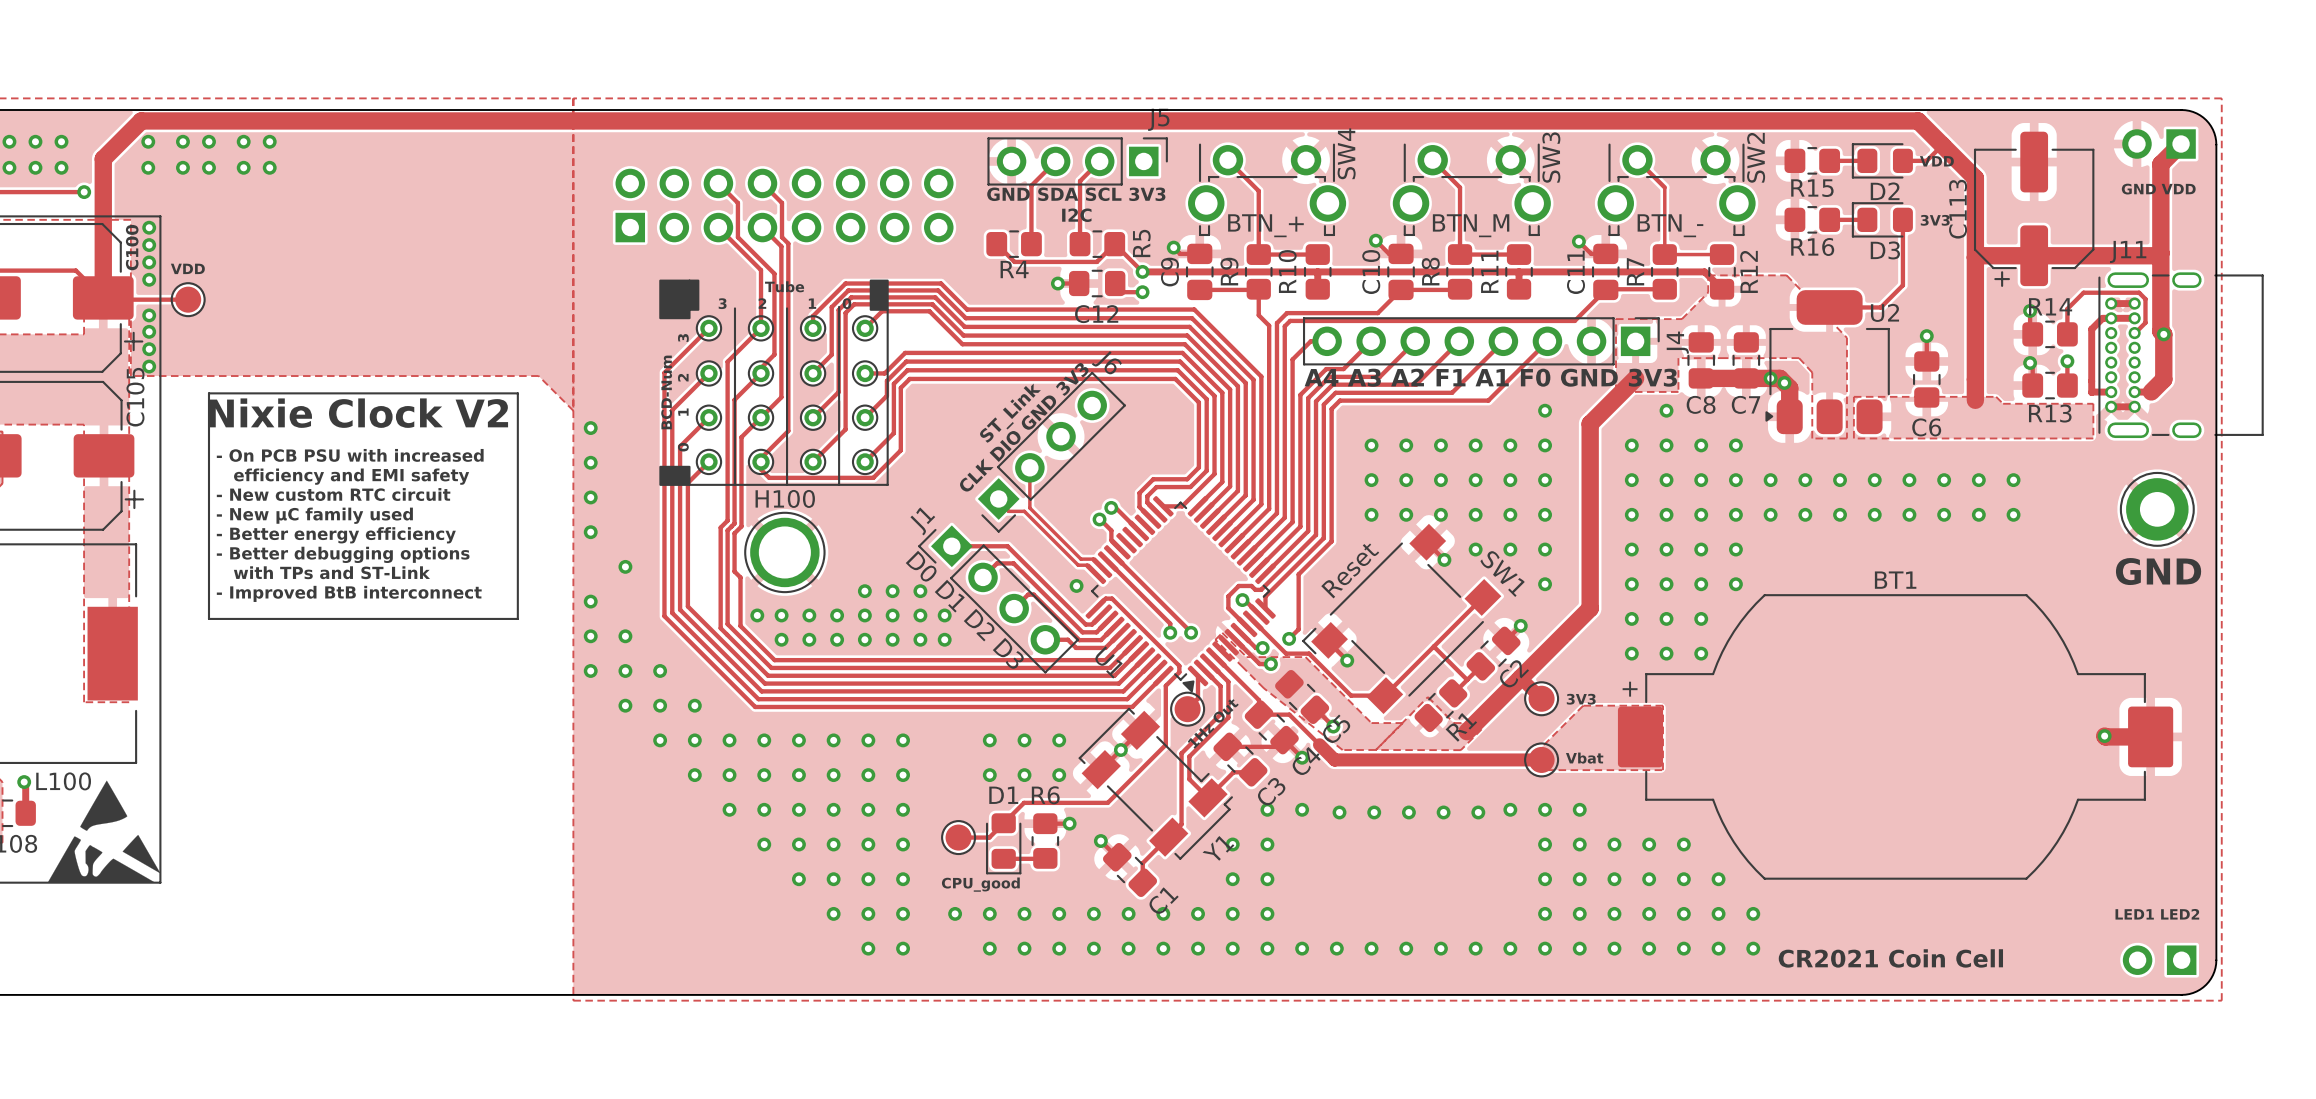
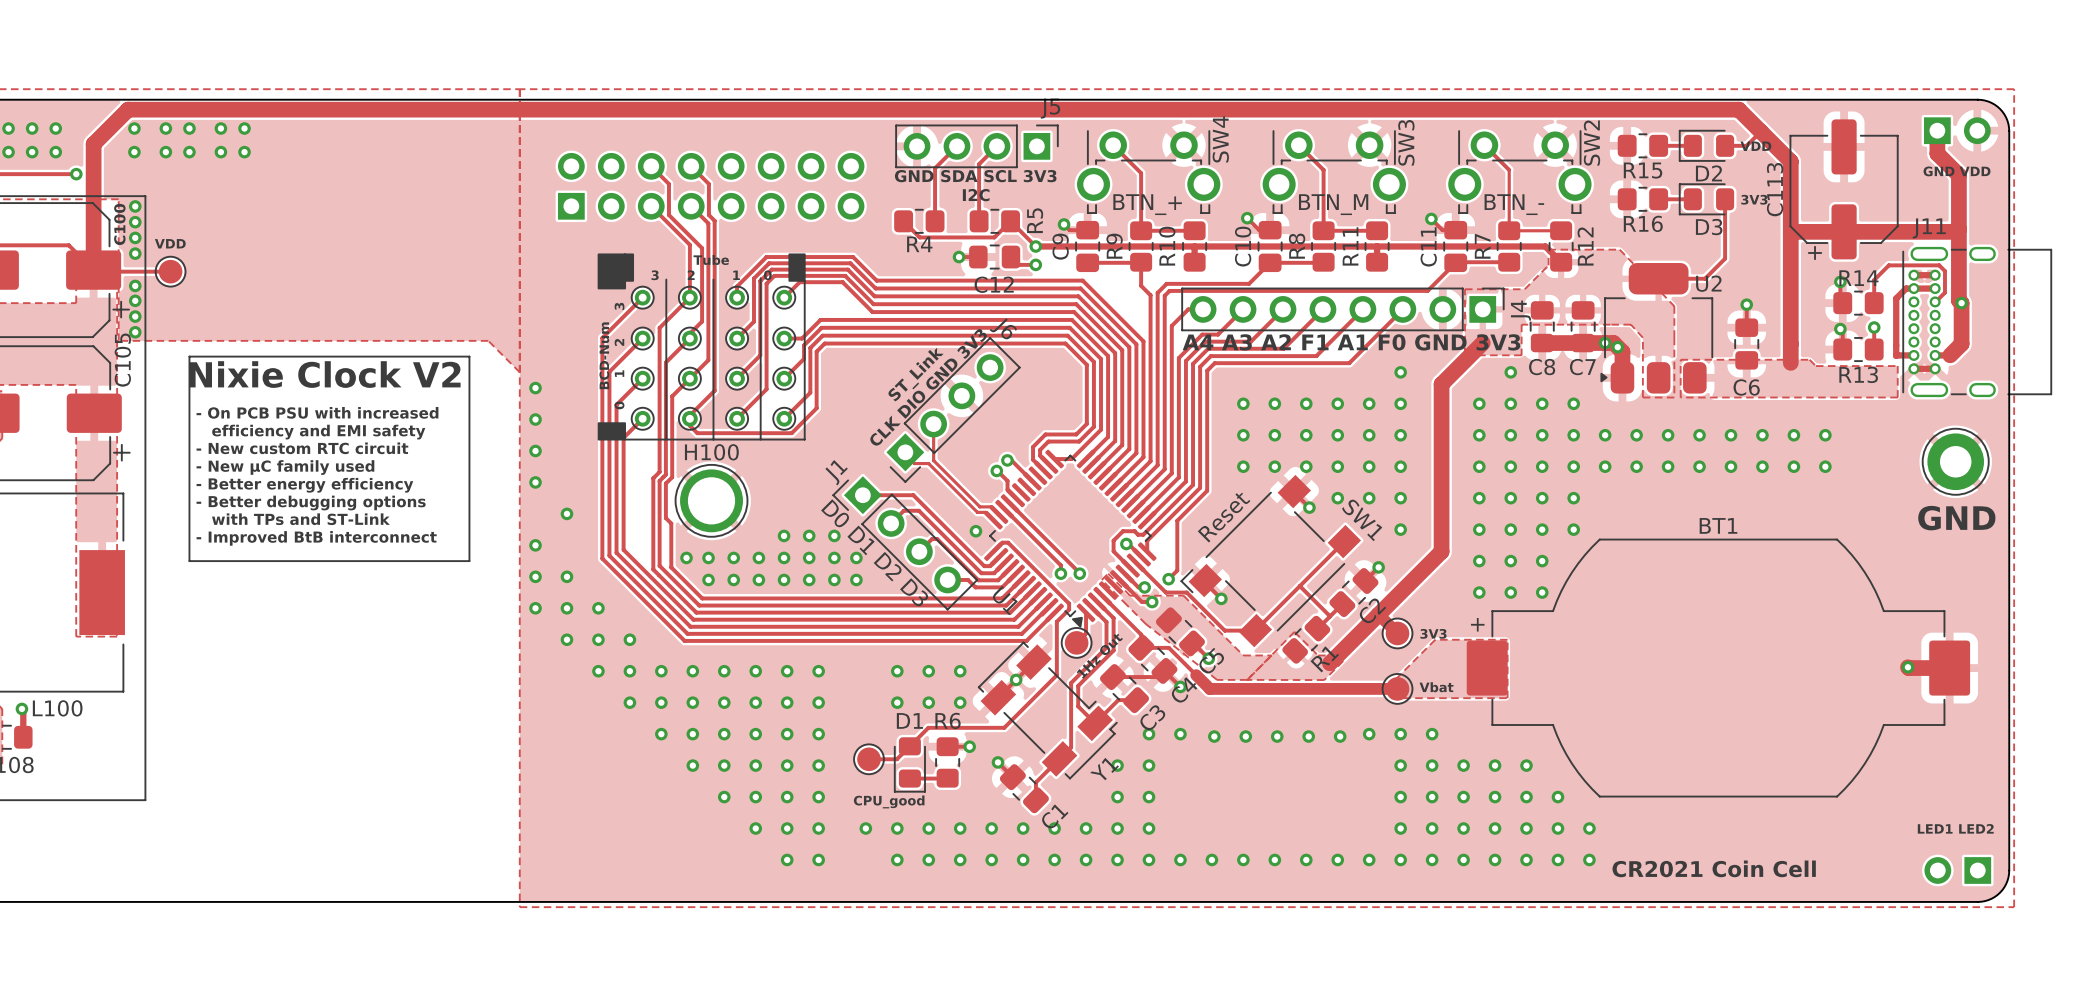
part rotation: 0° (2159, 144) -> 180° (1957, 130)
track: (2181, 144) (2160, 164) (2160, 193) -> (1937, 130) (1937, 153) (1958, 175)
drawing: [47, 780, 161, 883] -> none

